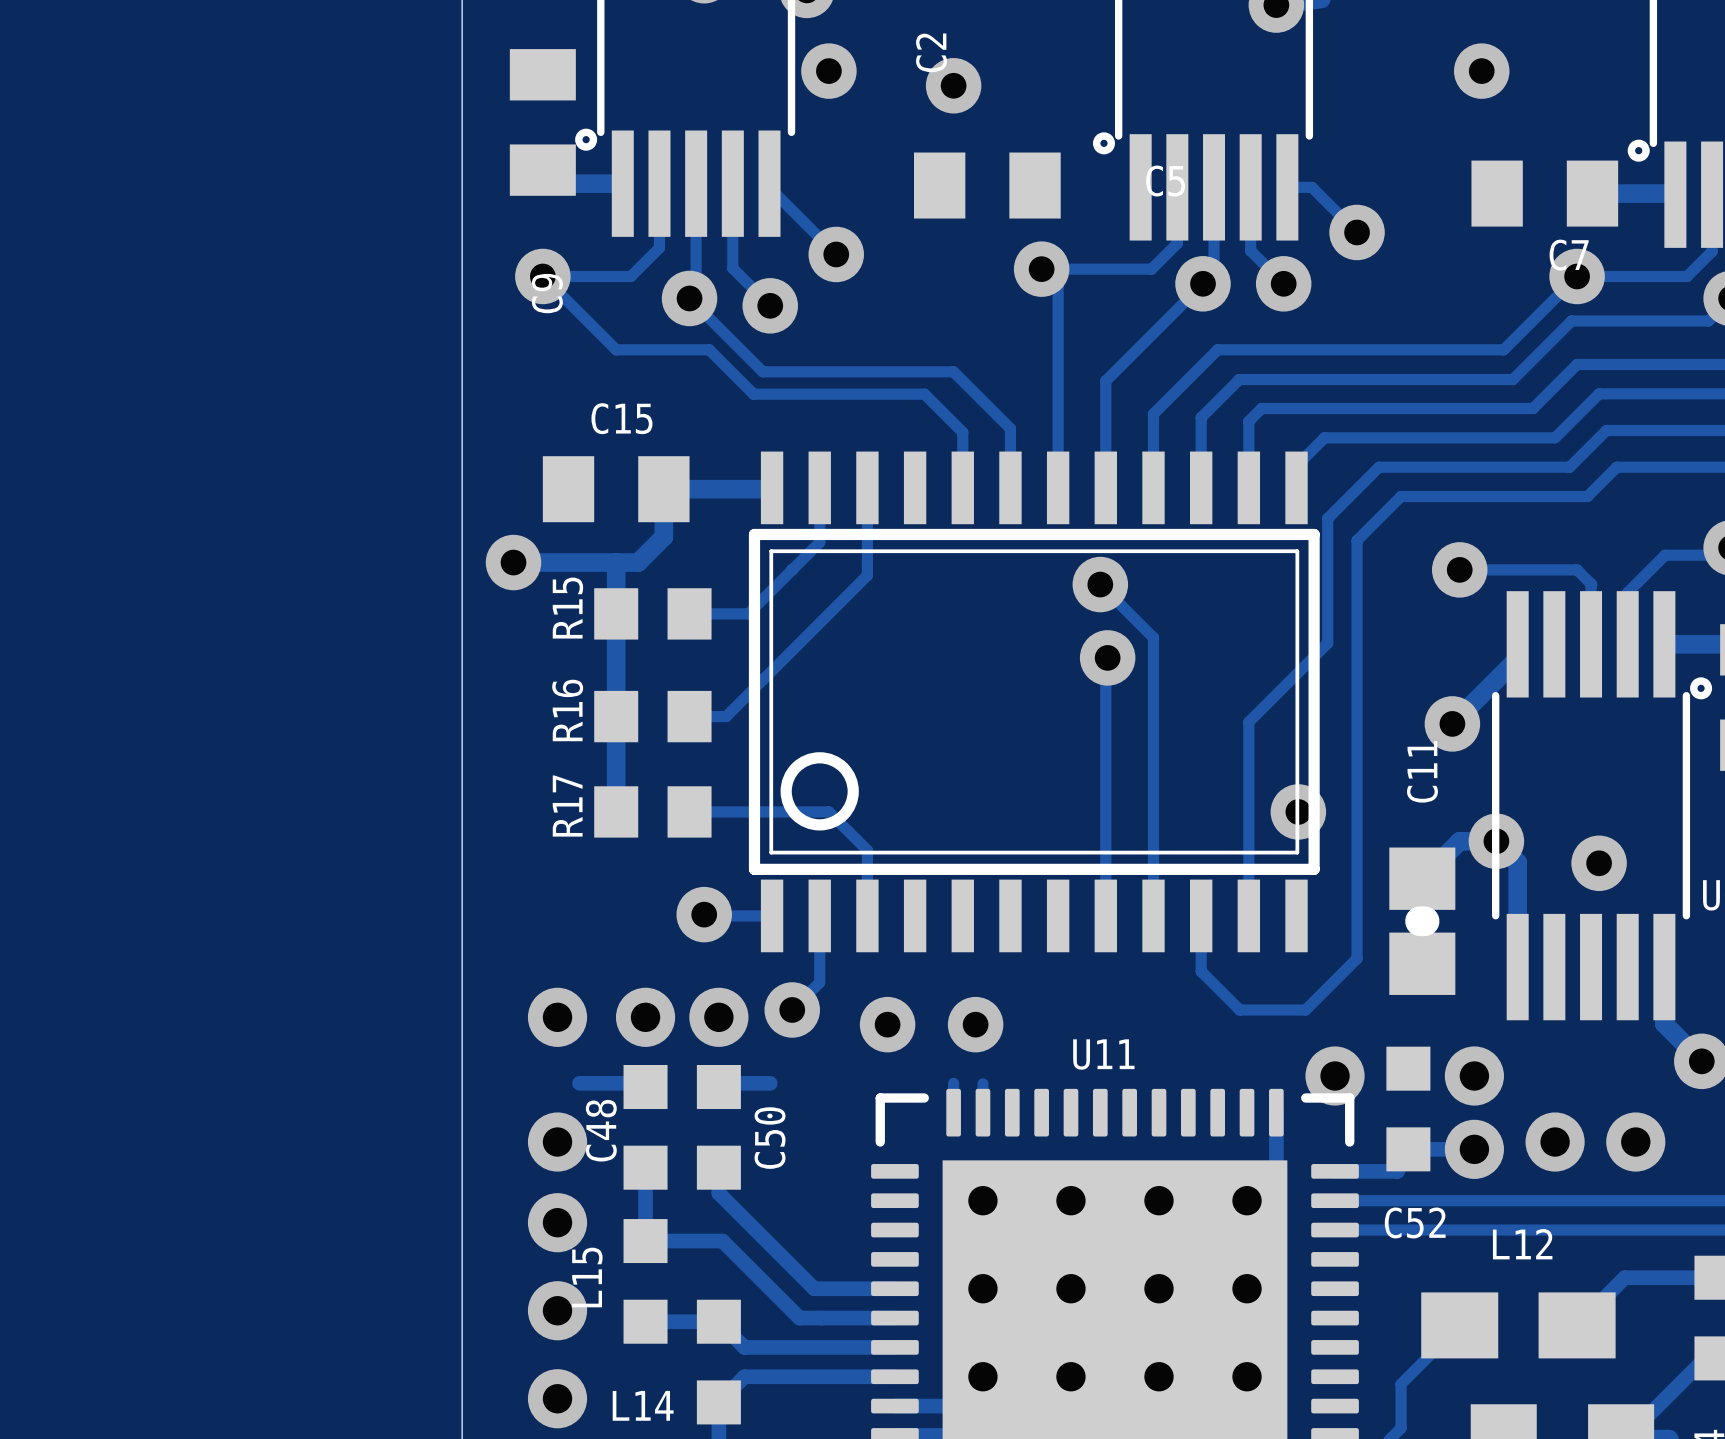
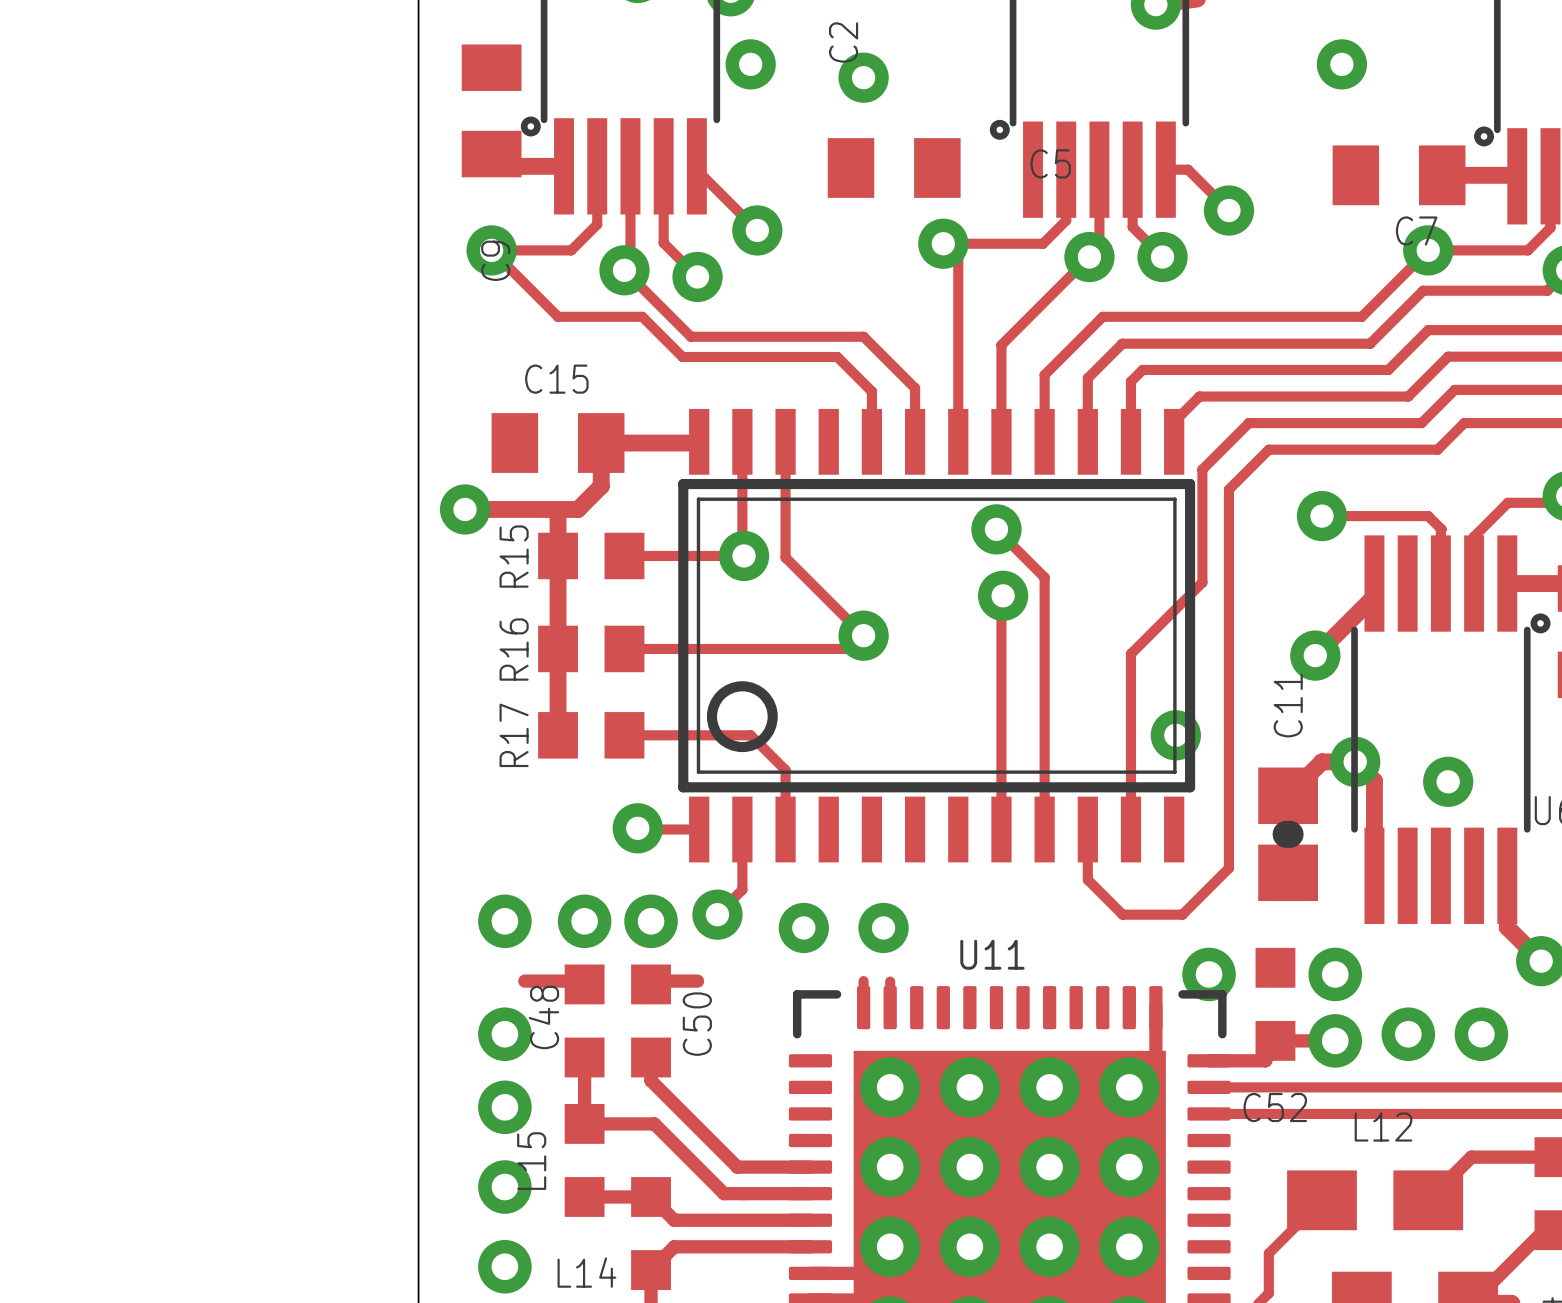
track: (819, 542) (748, 613) -> (742, 491) (742, 554) (744, 555) (677, 555)
track: (867, 575) (726, 716) -> (785, 521) (785, 557) (863, 635) (850, 648) (657, 648)
via: none -> (744, 555)
via: none -> (863, 635)

